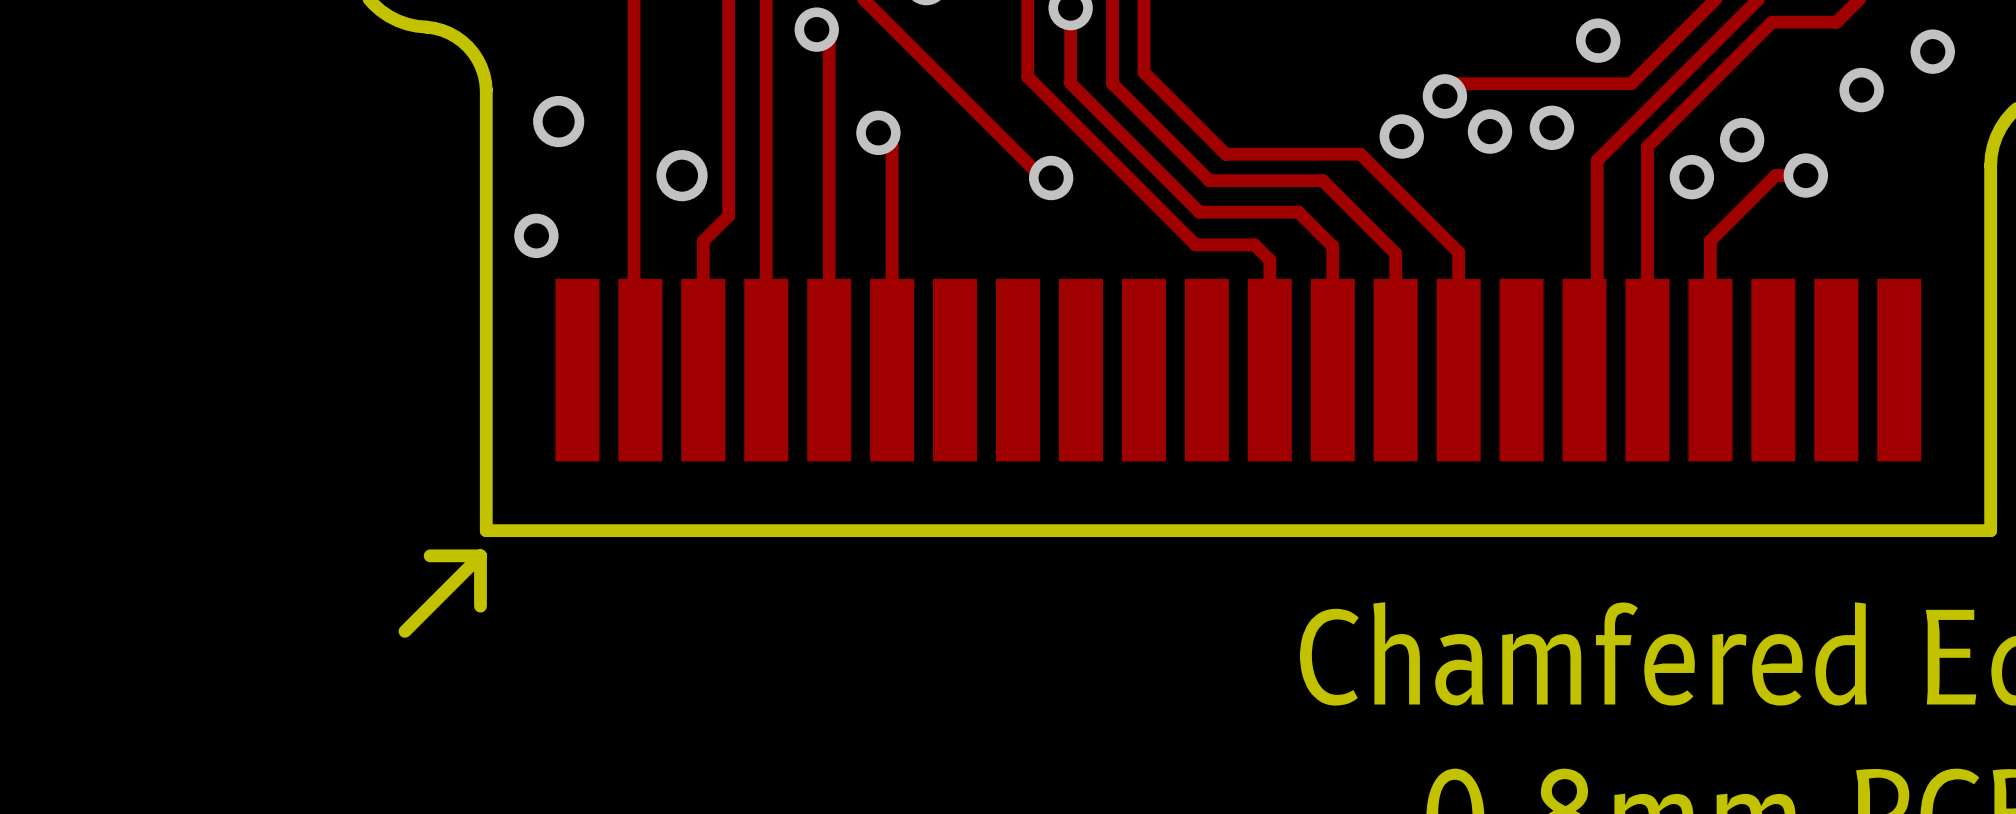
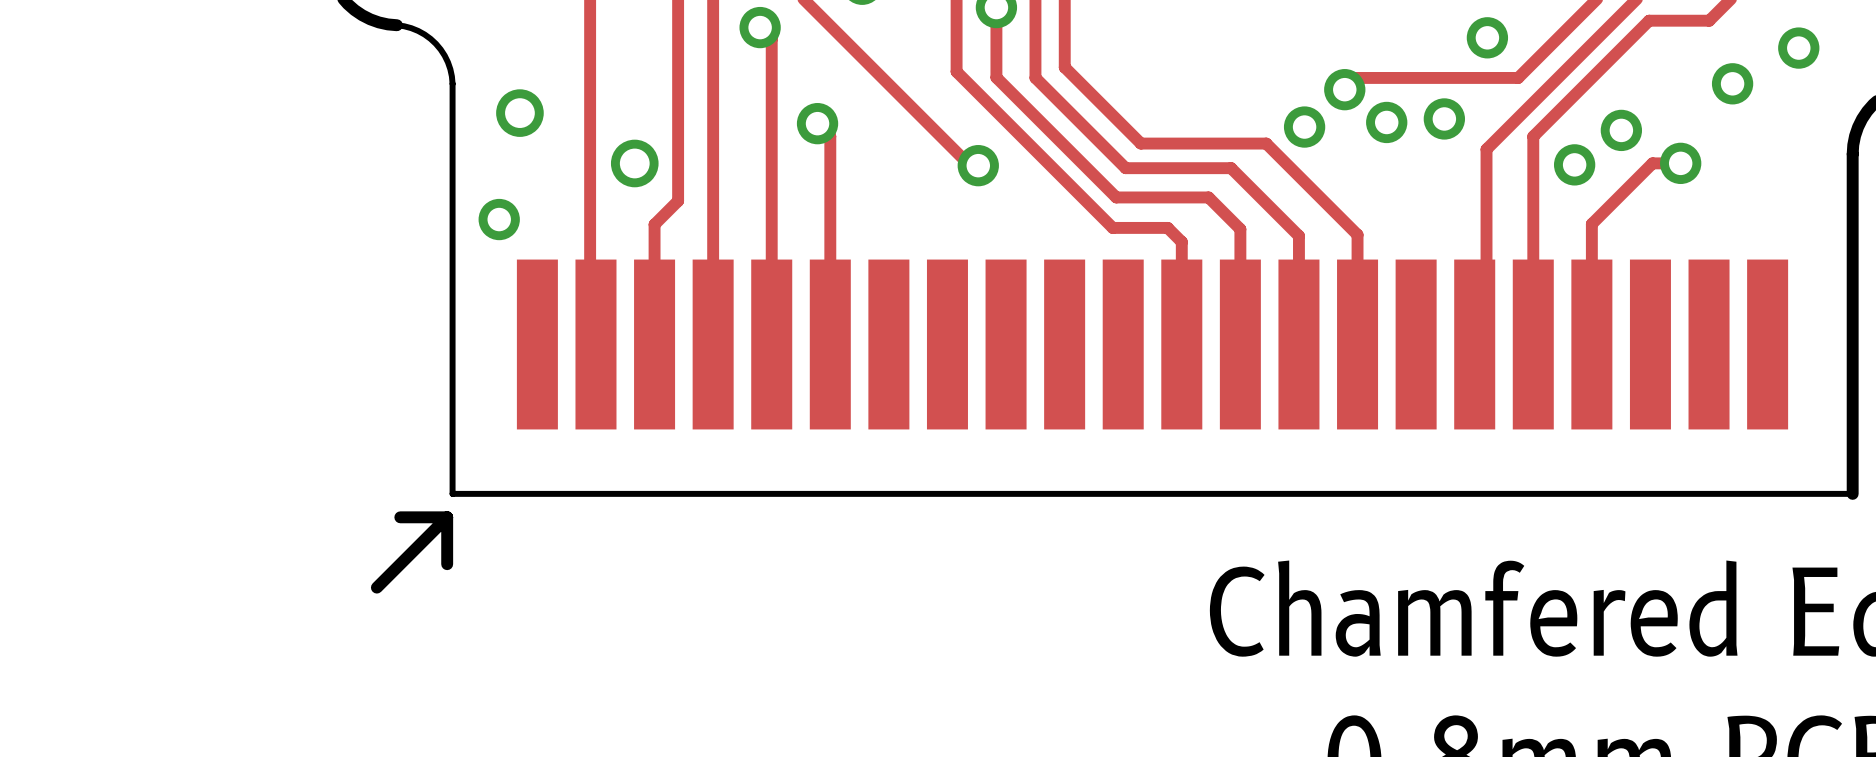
board edge width: thick (426, 27) (449, 33) (468, 47) (477, 59) (485, 82) (486, 530) (1990, 530) -> thin (396, 25) (418, 30) (435, 43) (444, 55) (451, 76) (452, 493) (1852, 493)

